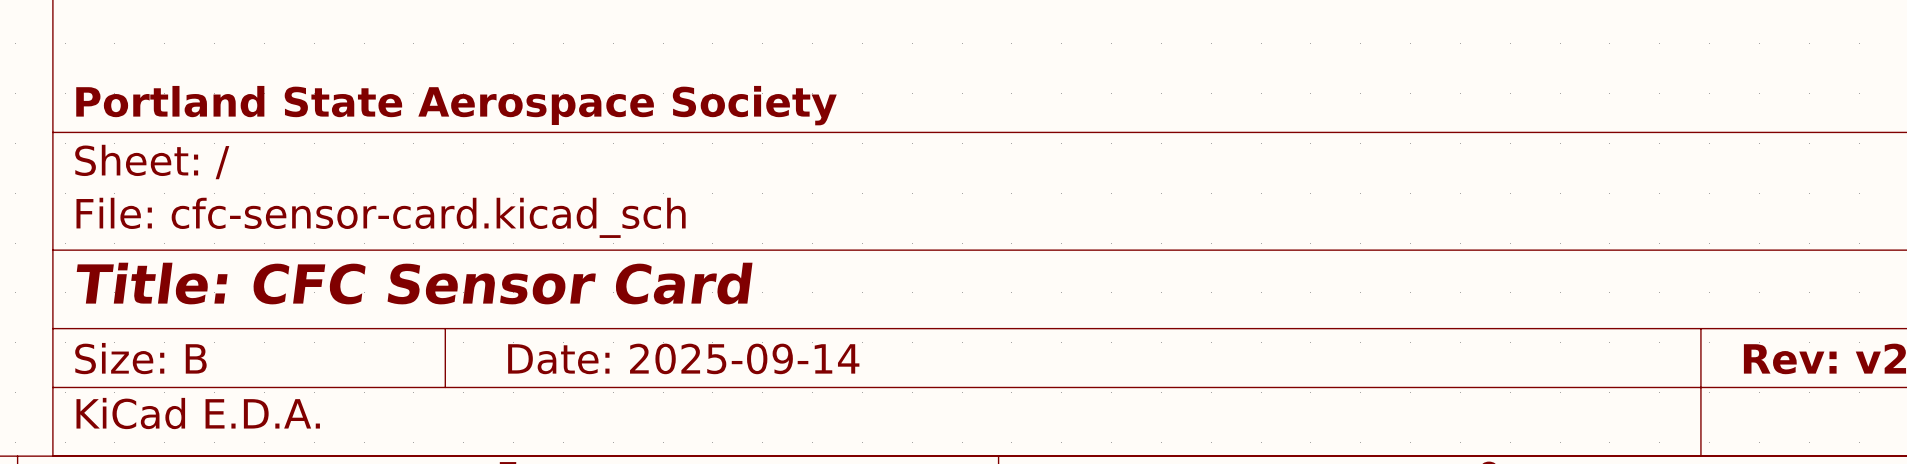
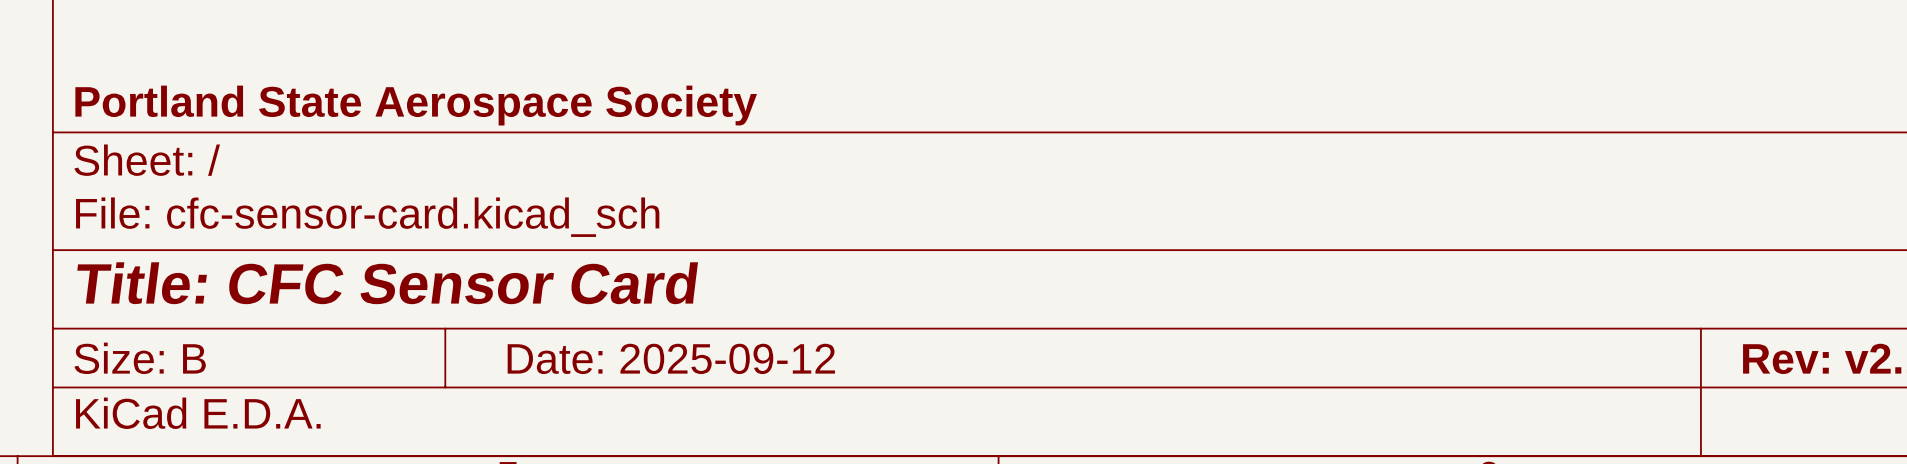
title block: Date: 2025-09-14 (683, 358) -> Date: 2025-09-12 (671, 358)

